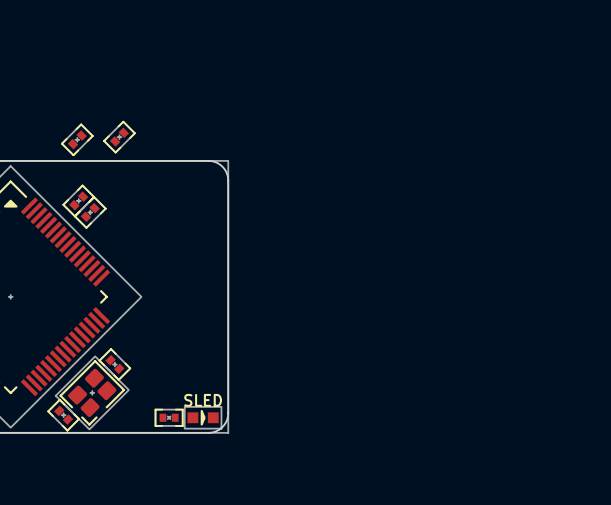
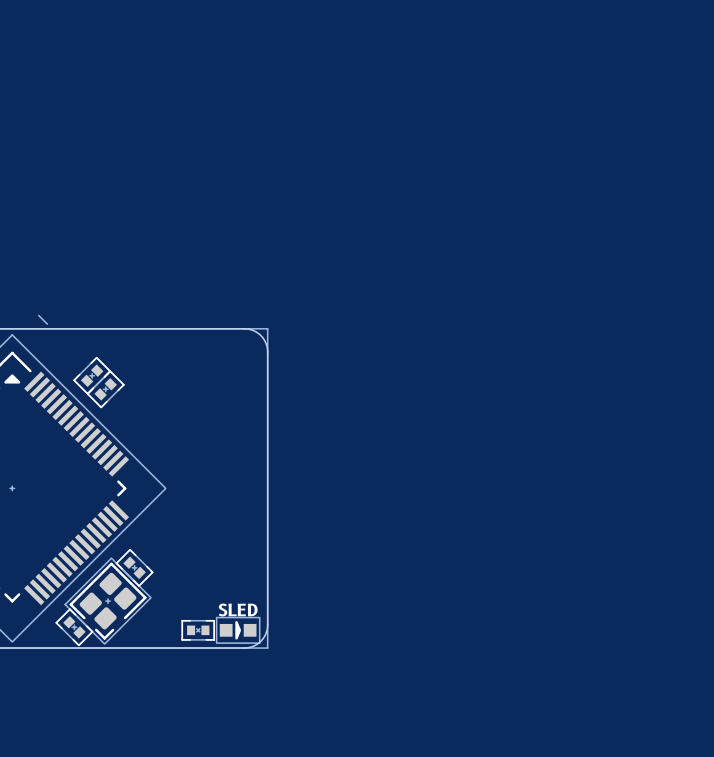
part: (119, 137) -> none
part: (77, 139) -> none
line: none -> (38, 315) (47, 324)

